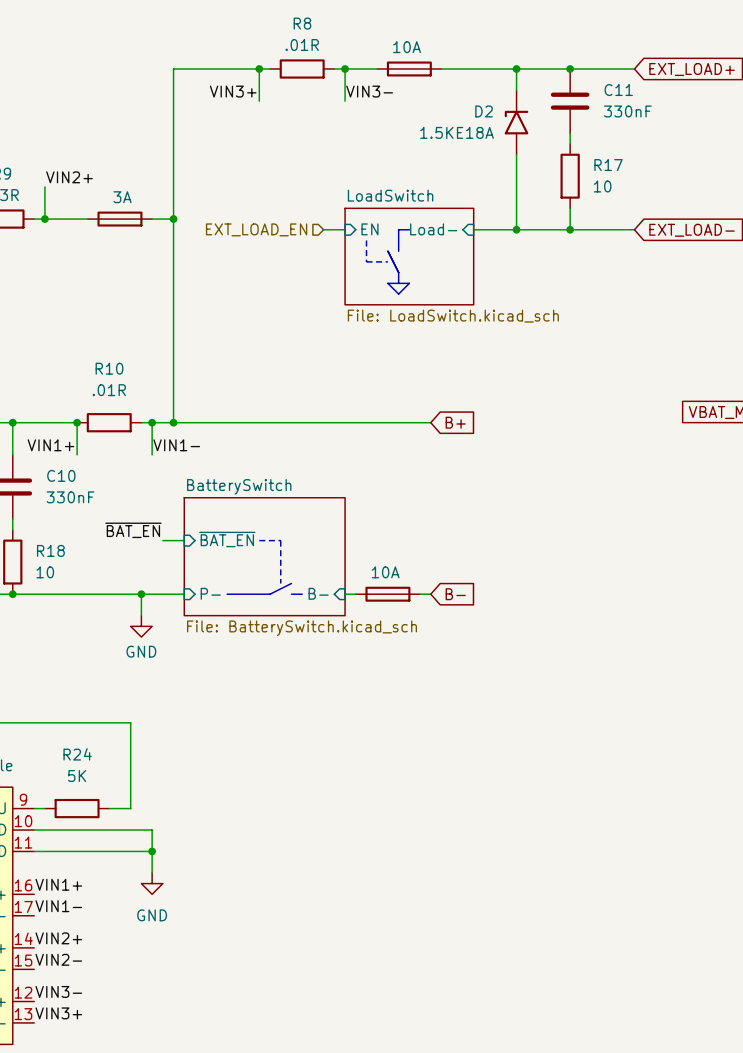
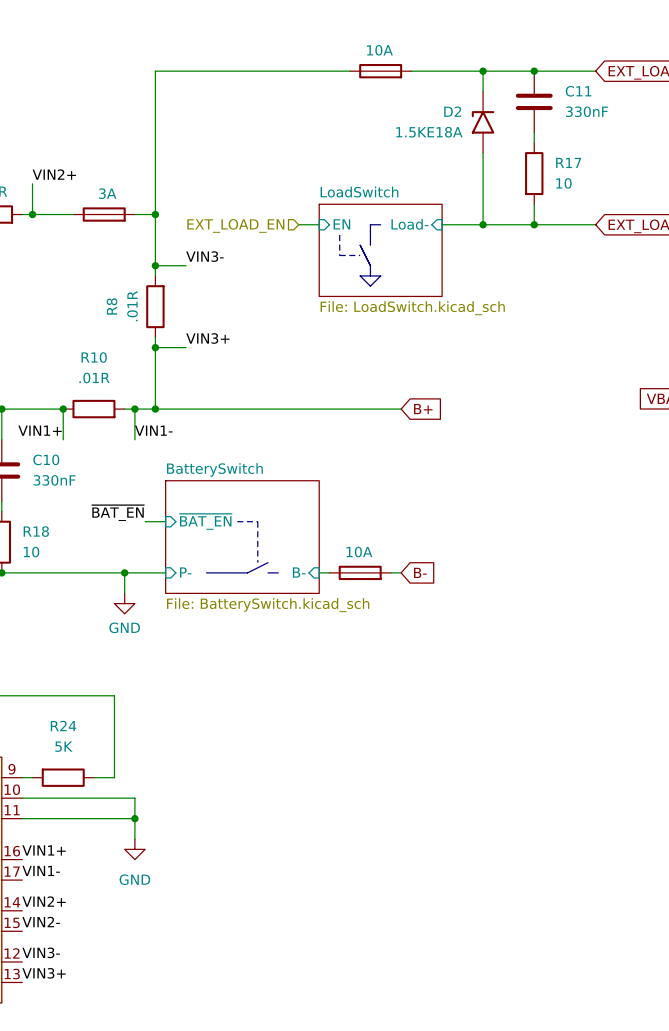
R8 name position: R8 (302, 23) -> R8 (112, 306)
R8 value position: .01R (302, 45) -> .01R (132, 306)
wire: (259, 68) (259, 101) -> none
junction: (259, 68) -> none
wire: none -> (247, 71) (308, 71)
R8 rotation: 0° (302, 68) -> 90° clockwise (155, 306)
R8 position: (302, 68) -> (155, 306)
wire: (345, 68) (345, 101) -> none
junction: (345, 68) -> none
label: VIN3+ (233, 91) -> none
label: VIN3- (369, 91) -> none
label: none -> VIN3- (204, 256)
wire: none -> (155, 265) (186, 265)
junction: none -> (155, 265)
wire: (173, 283) (173, 347) -> none
label: none -> VIN3+ (207, 338)
wire: none -> (155, 347) (186, 347)
junction: none -> (155, 347)

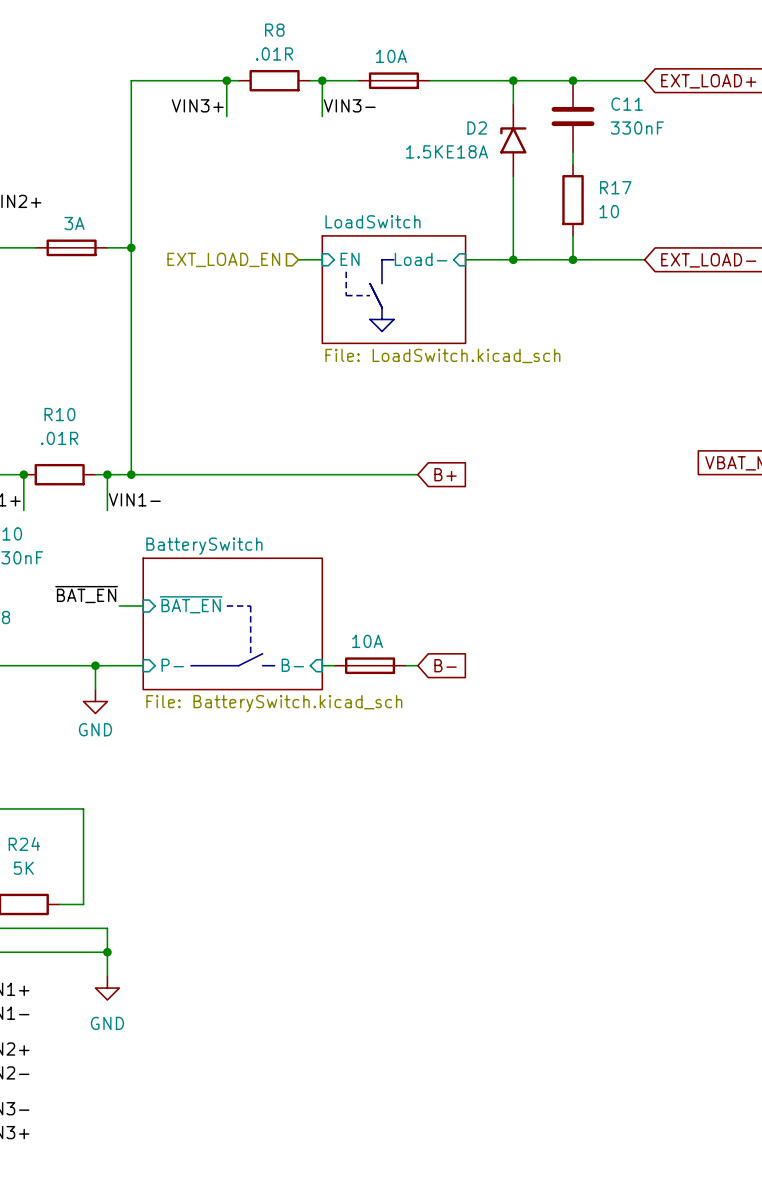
wire: none -> (226, 80) (226, 116)
junction: none -> (226, 80)
wire: (247, 71) (308, 71) -> none
wire: none -> (322, 80) (322, 116)
junction: none -> (322, 80)
label: none -> VIN3+ (197, 105)
label: none -> VIN3- (349, 105)
label: VIN3- (204, 256) -> none
wire: (155, 265) (186, 265) -> none
junction: (155, 265) -> none
wire: none -> (131, 319) (131, 391)
R8 rotation: 0° (155, 306) -> 90° clockwise (274, 80)
R8 position: (155, 306) -> (274, 80)
label: VIN3+ (207, 338) -> none
wire: (155, 347) (186, 347) -> none
junction: (155, 347) -> none

